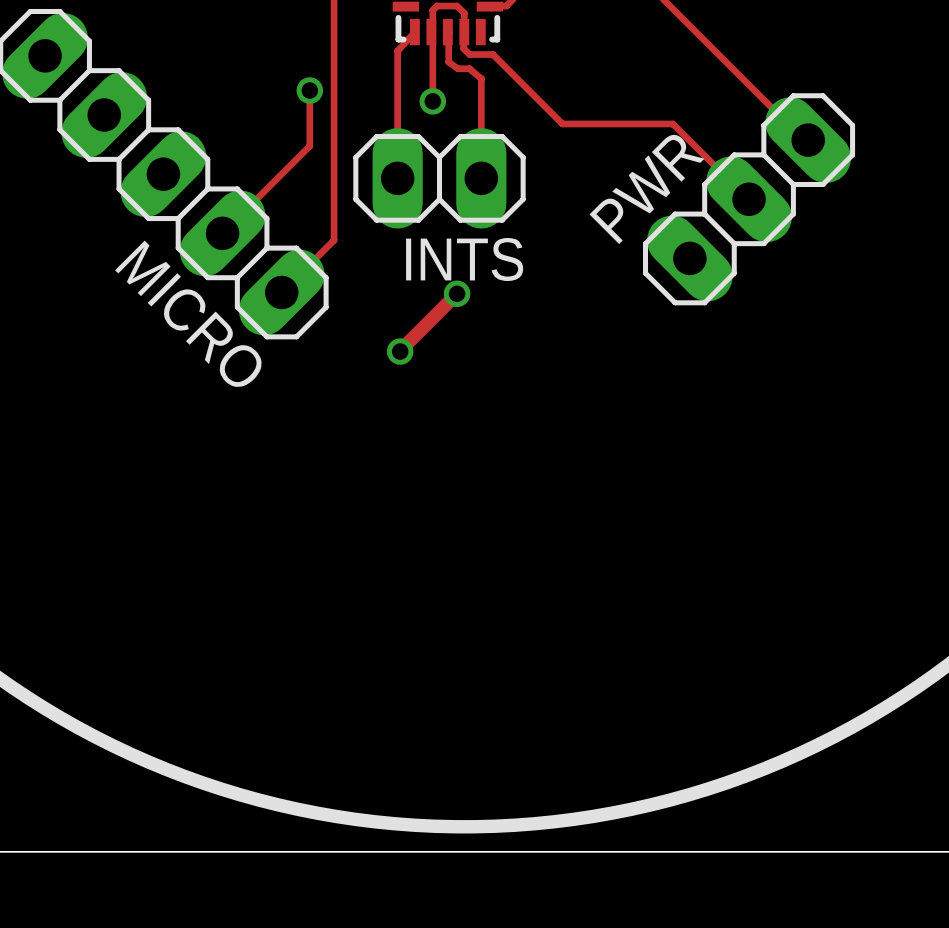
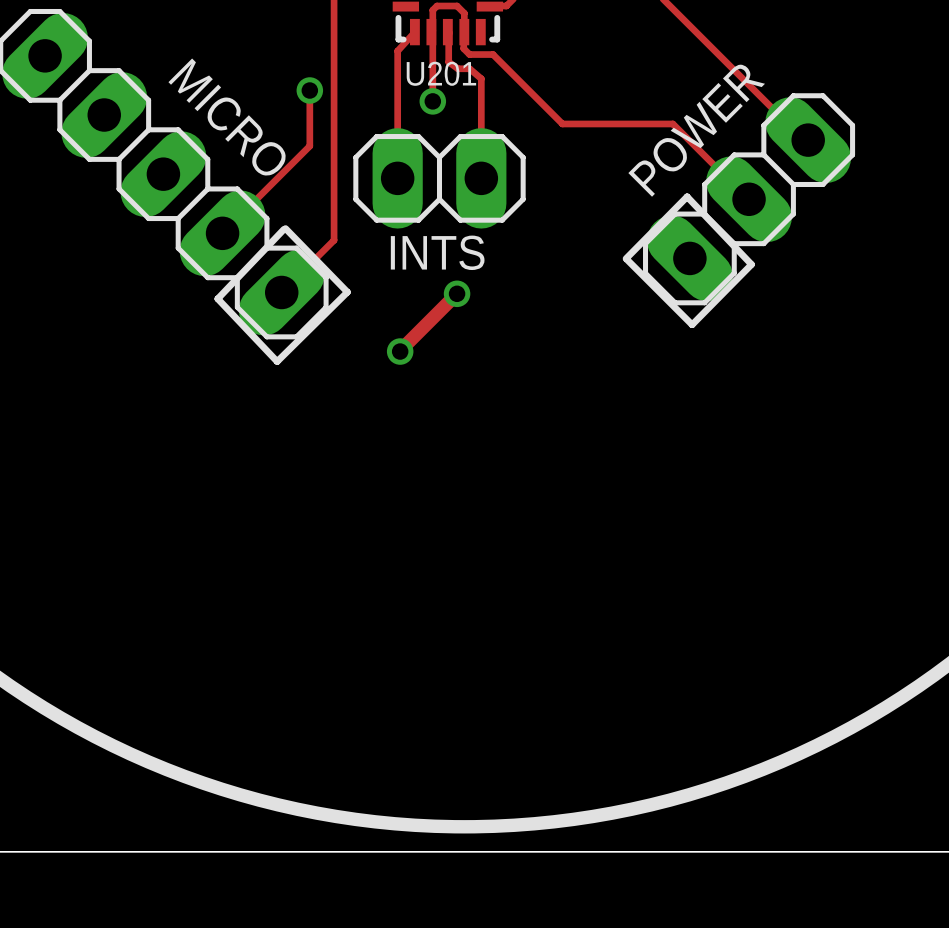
text: none -> U201 (441, 73)
text: none -> MICRO (227, 117)
text: none -> POWER (696, 130)
PWR name: PWR (646, 189) -> none
line: none -> (285, 228) (347, 292) (277, 361) (217, 298) (283, 229)
text: none -> INTS (437, 252)
line: none -> (626, 258) (687, 196) (751, 264) (692, 324) (626, 259)
INTS name: INTS (464, 259) -> none
MICRO name: MICRO (188, 314) -> none

